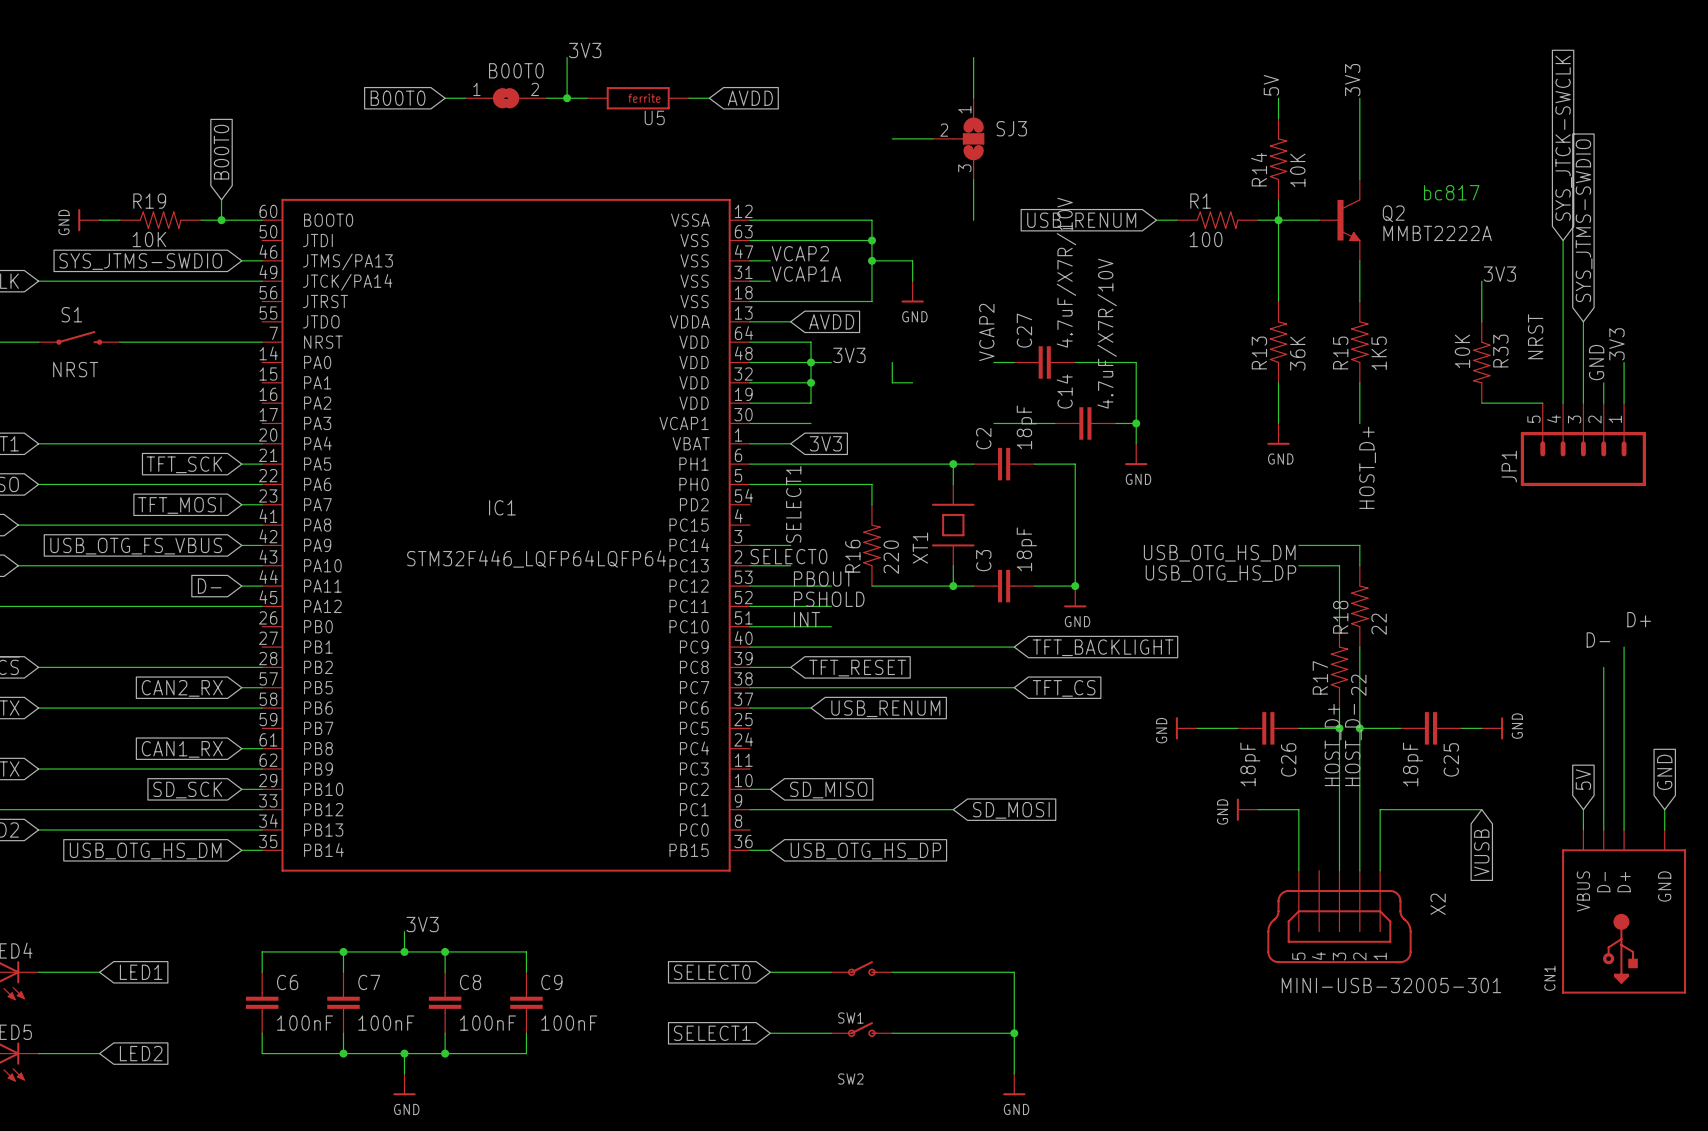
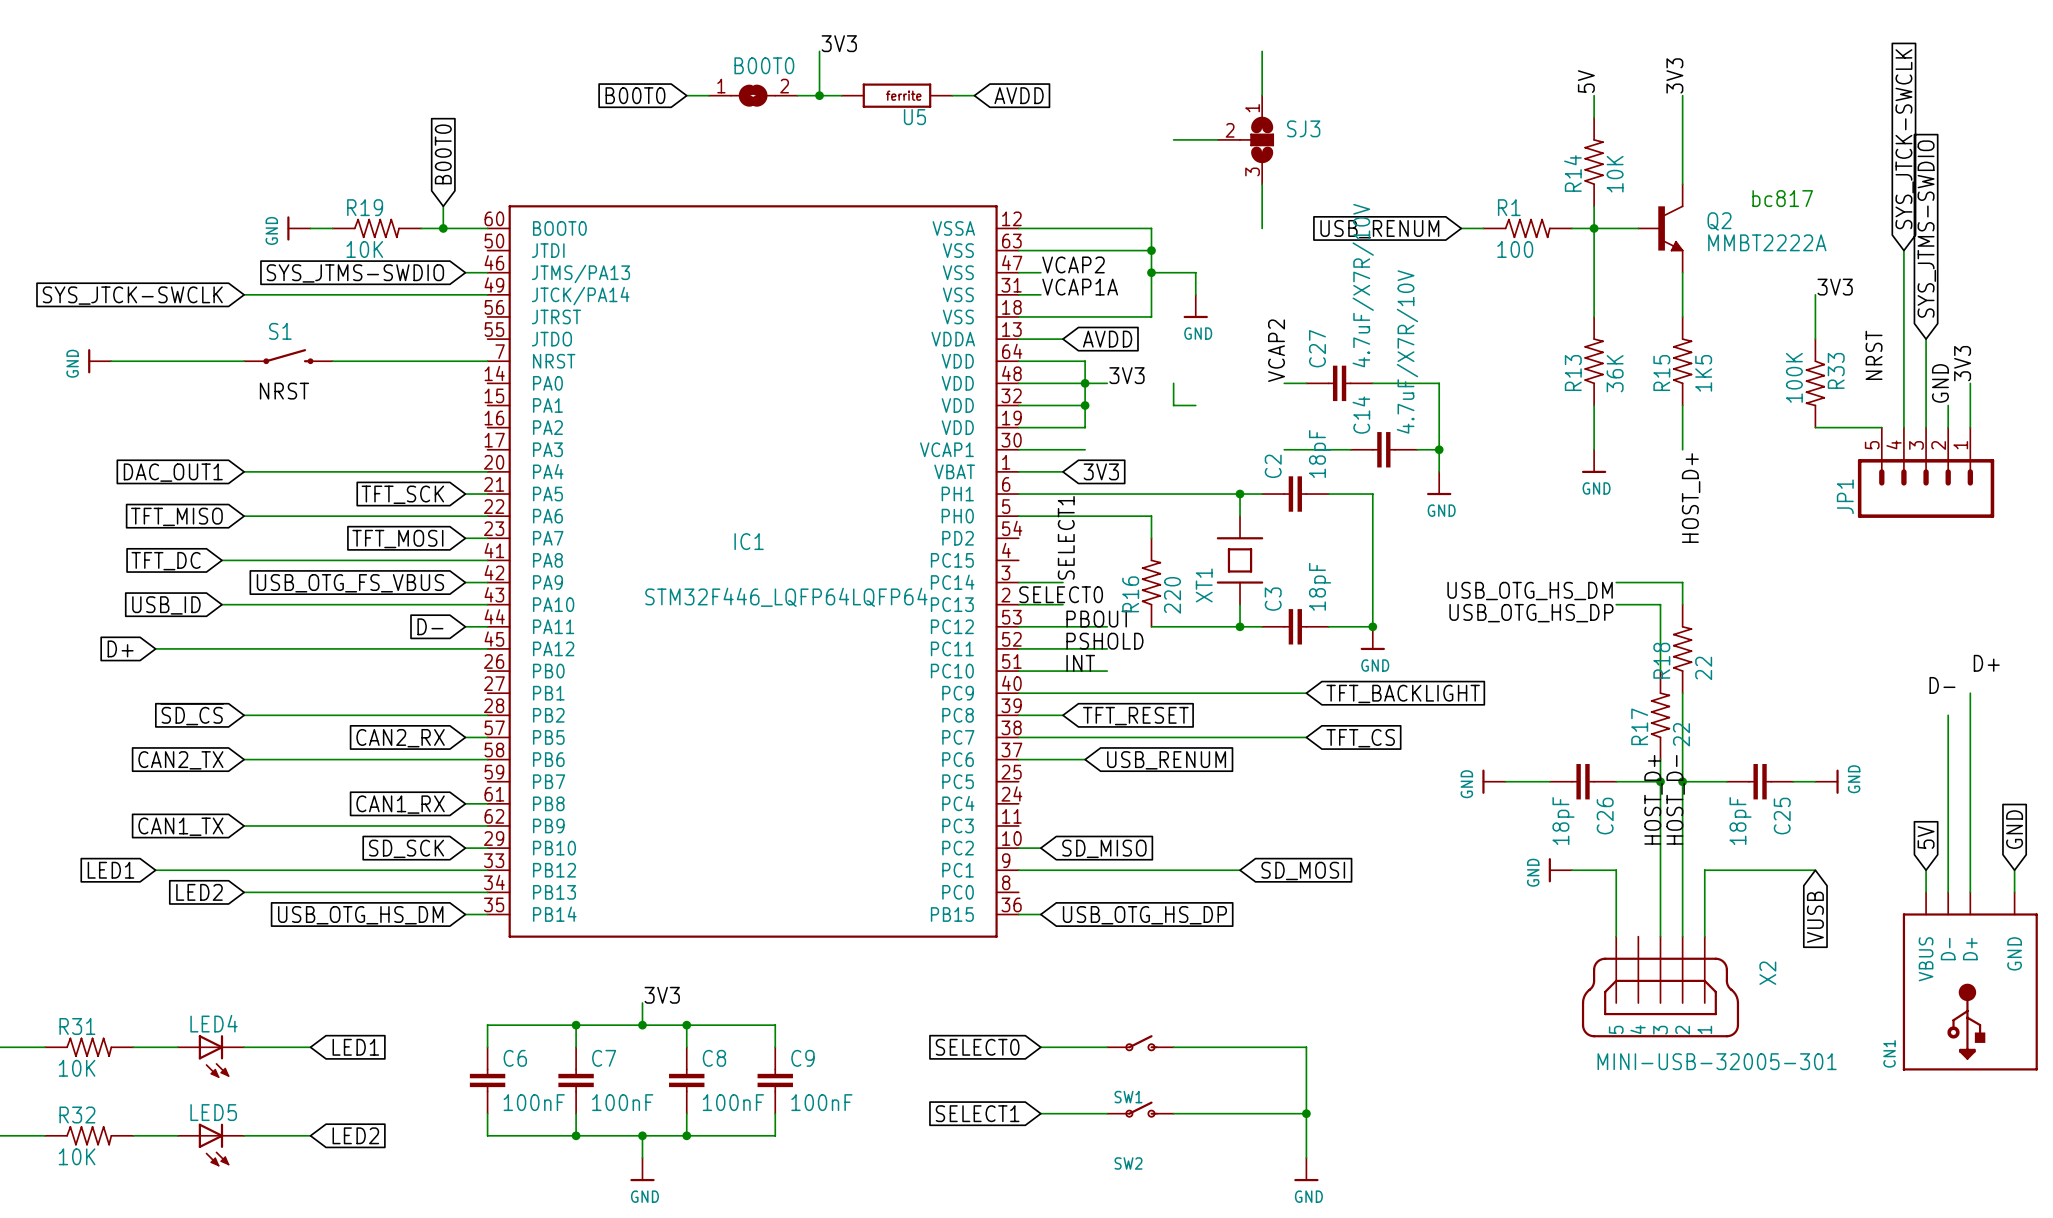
R33 value: 10K (1462, 351) -> 100K (1794, 377)

